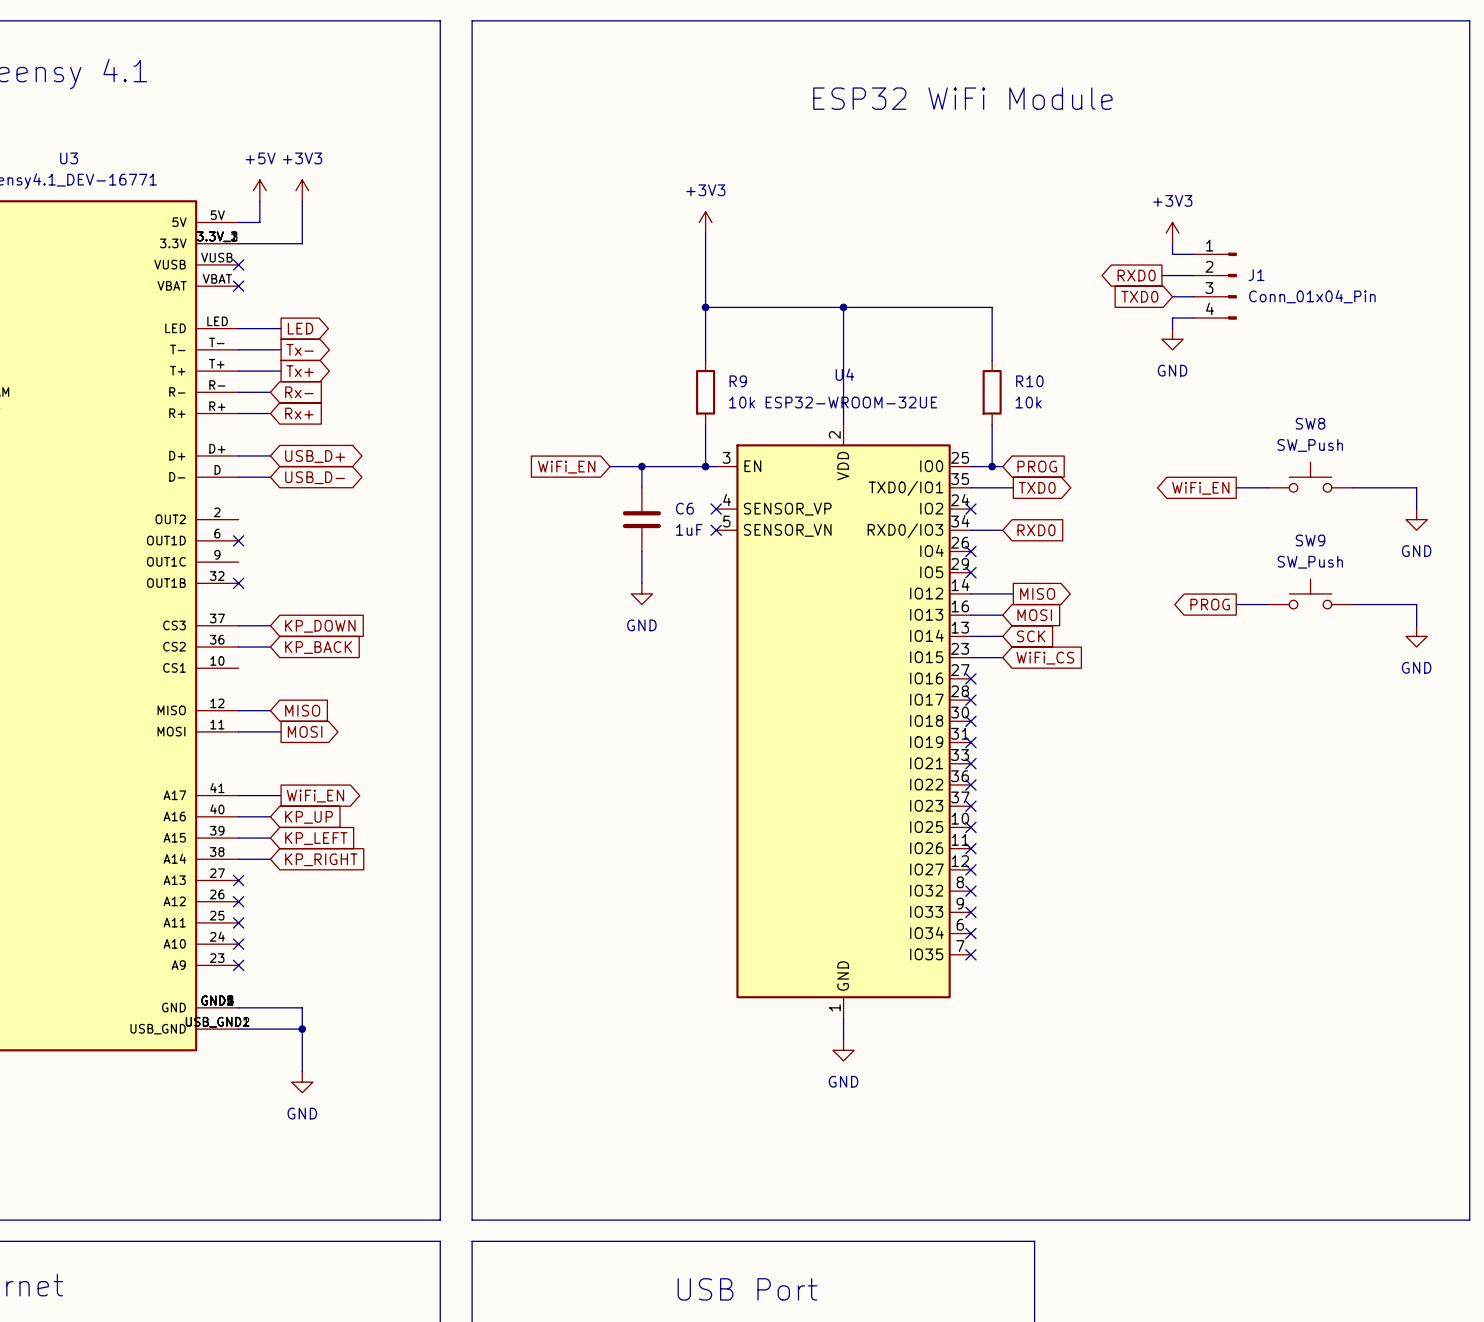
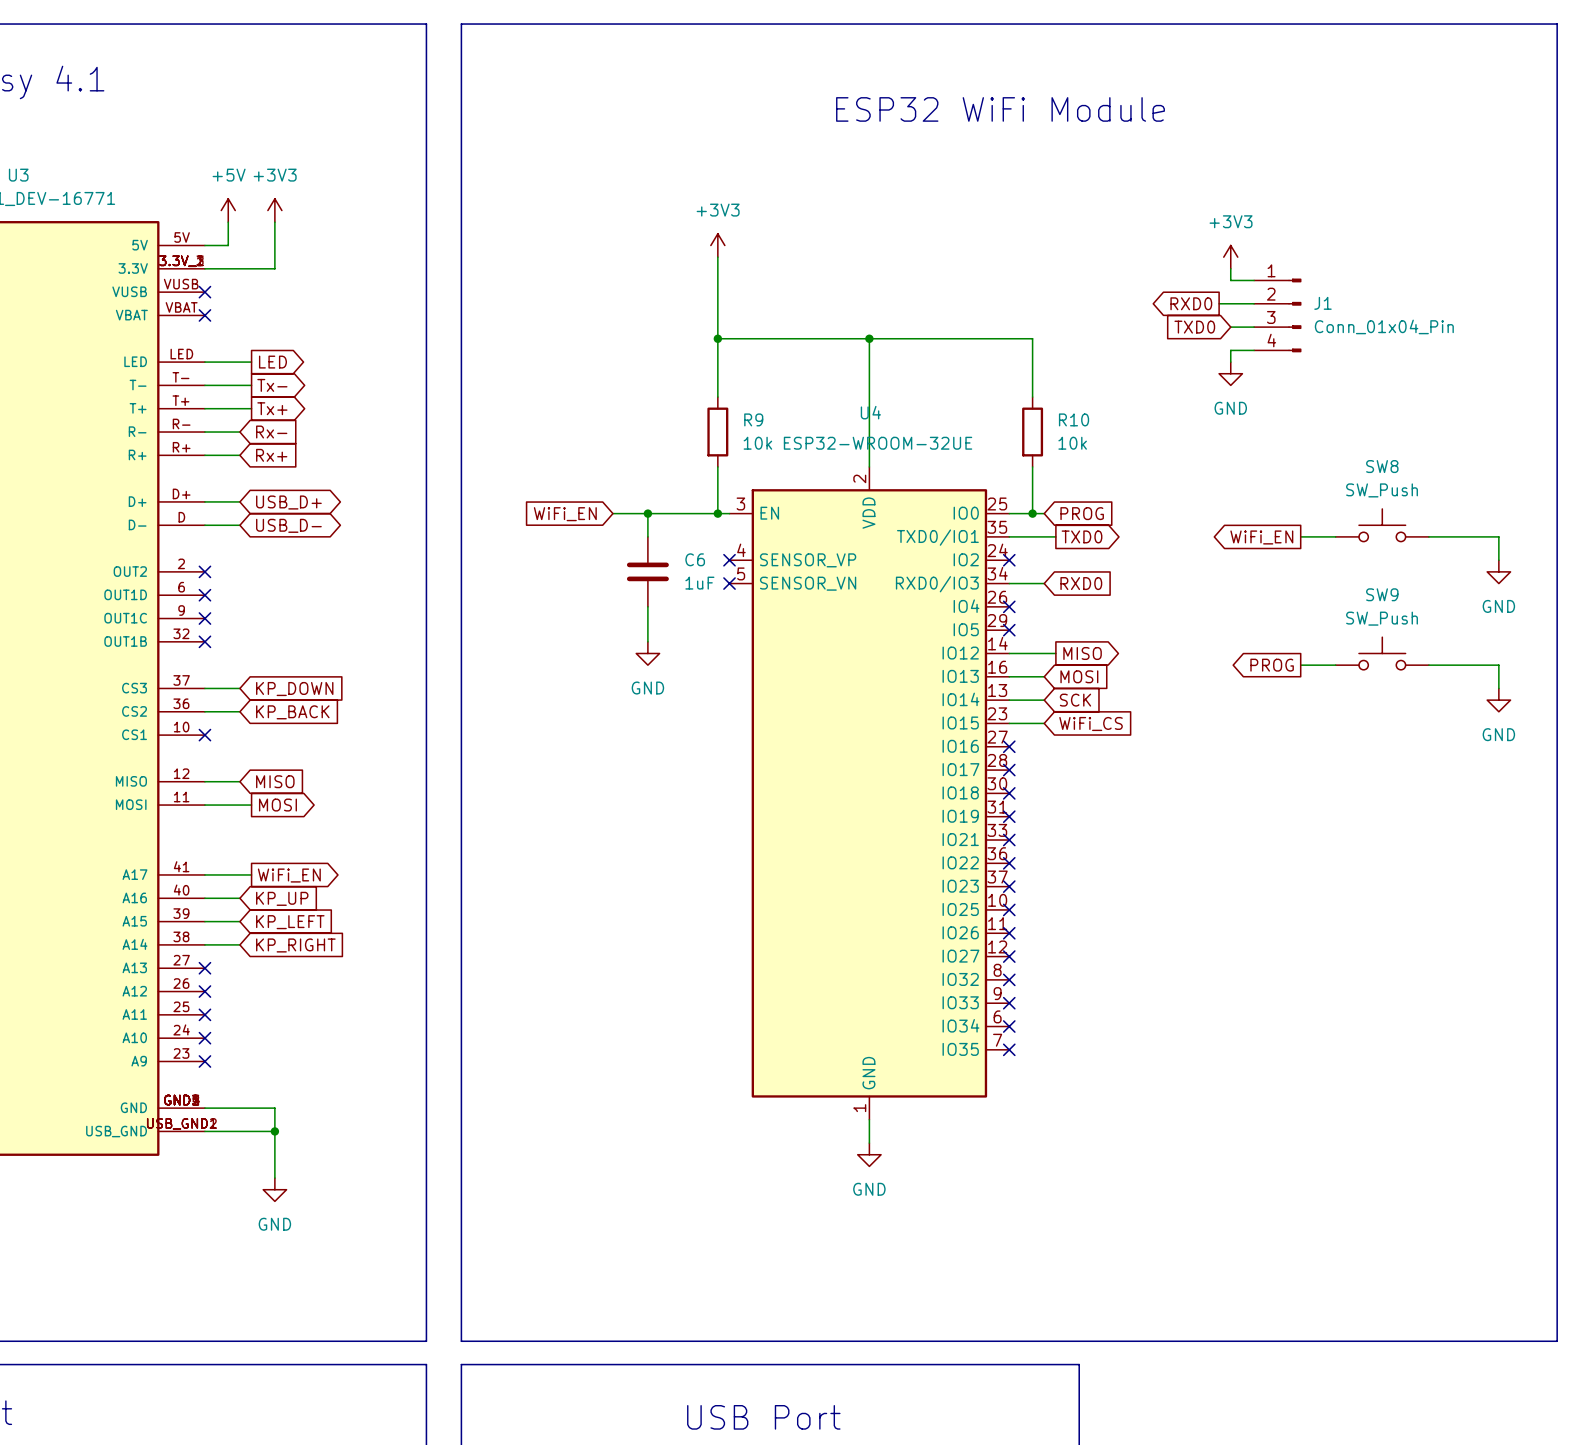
no-connect mark: none -> (204, 571)
no-connect mark: none -> (204, 618)
no-connect mark: none -> (204, 735)

